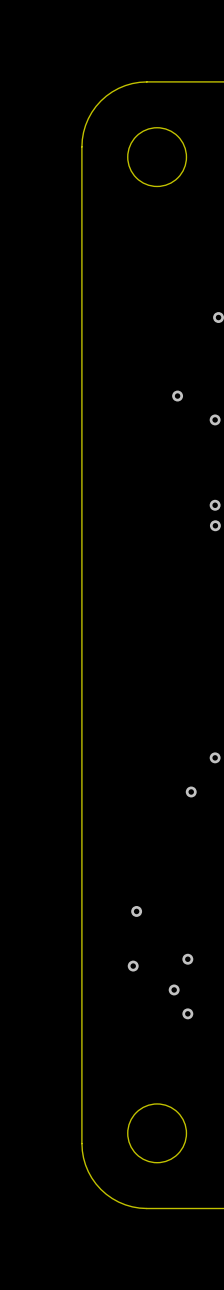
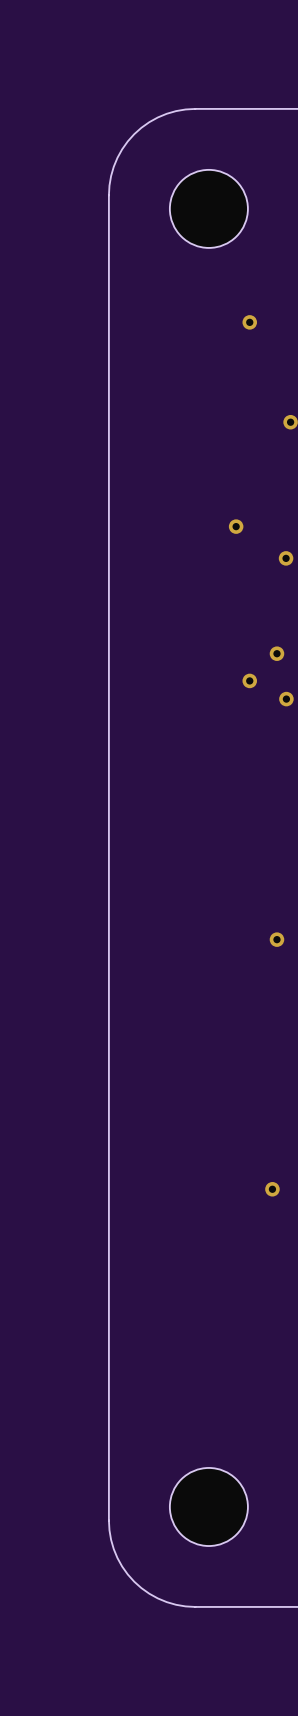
via: none -> (249, 322)
via: none -> (276, 653)
via: (215, 505) -> none
via: none -> (249, 680)
via: none -> (276, 939)
via: (215, 757) -> none
via: (191, 791) -> none
via: none -> (272, 1189)
via: (136, 911) -> none
via: (187, 959) -> none
via: (133, 966) -> none
via: (174, 989) -> none
via: (187, 1013) -> none

